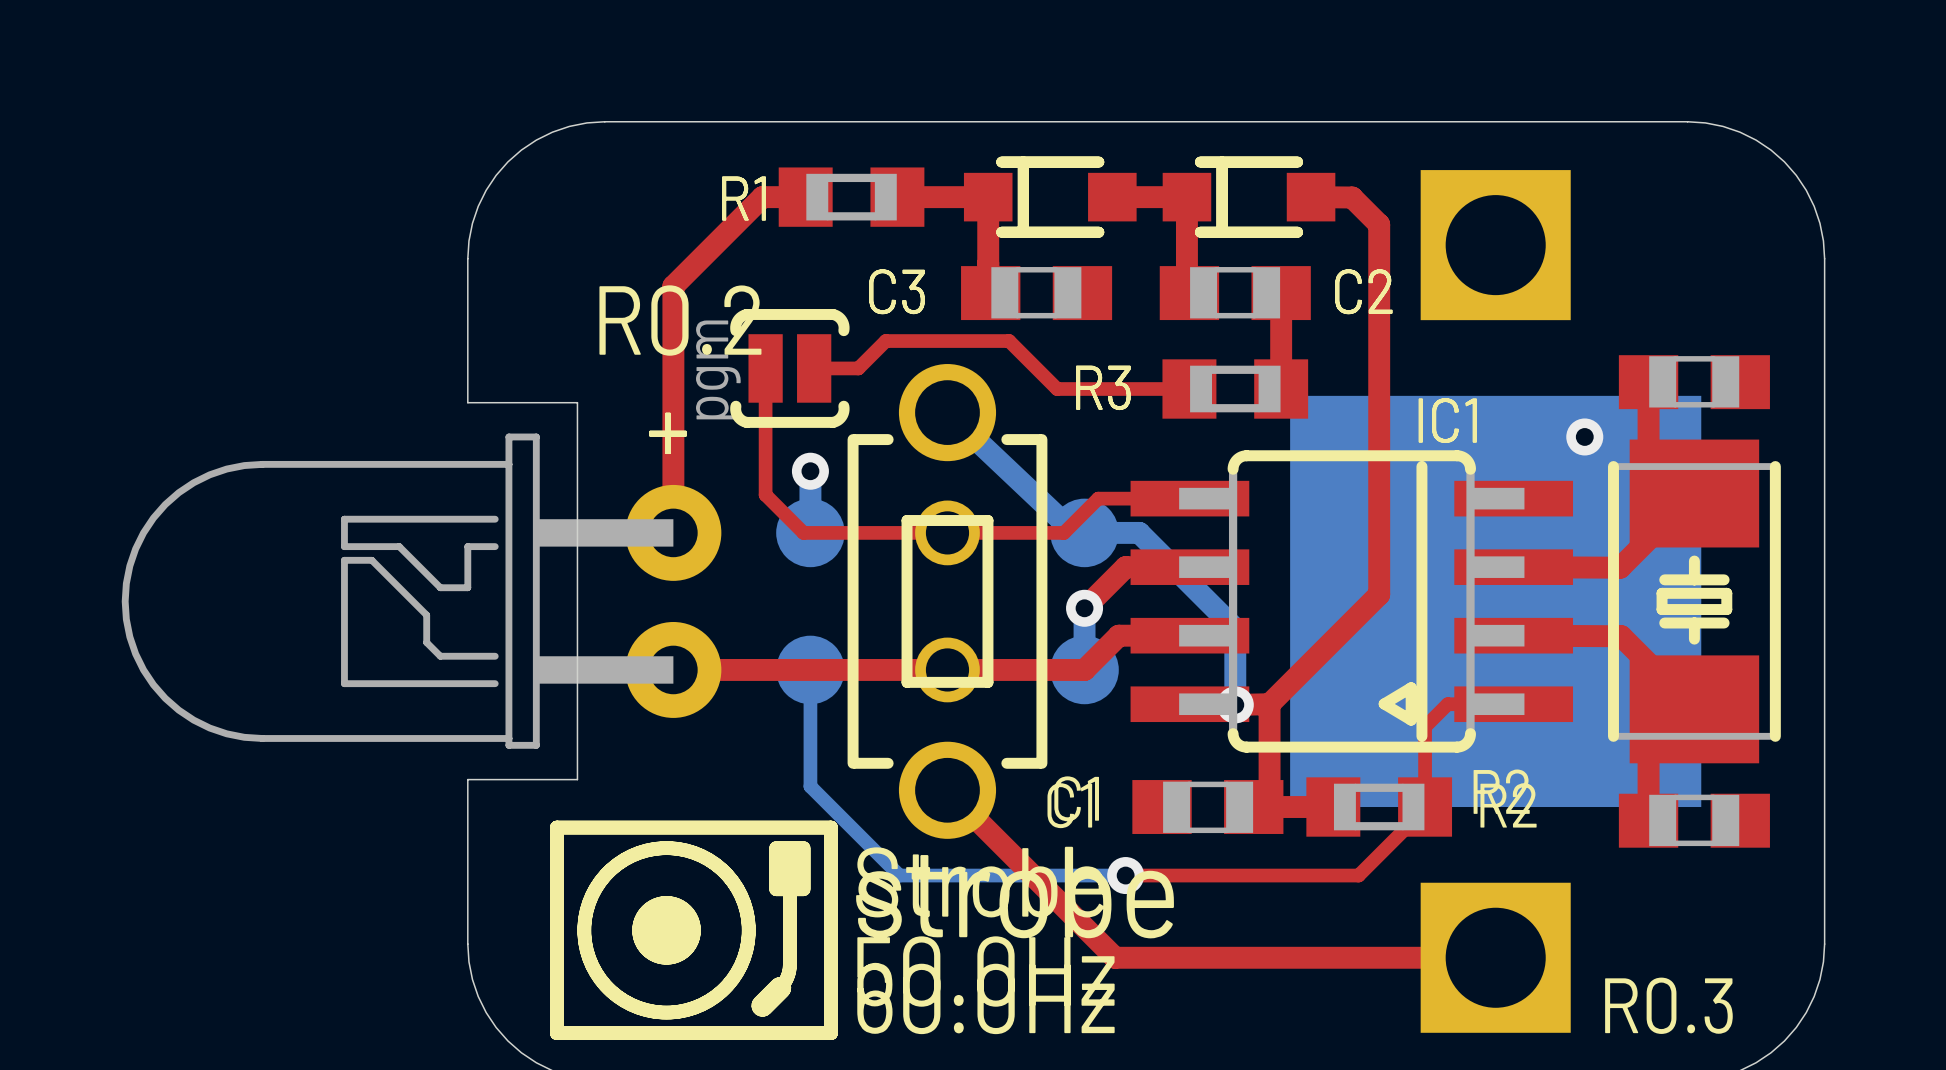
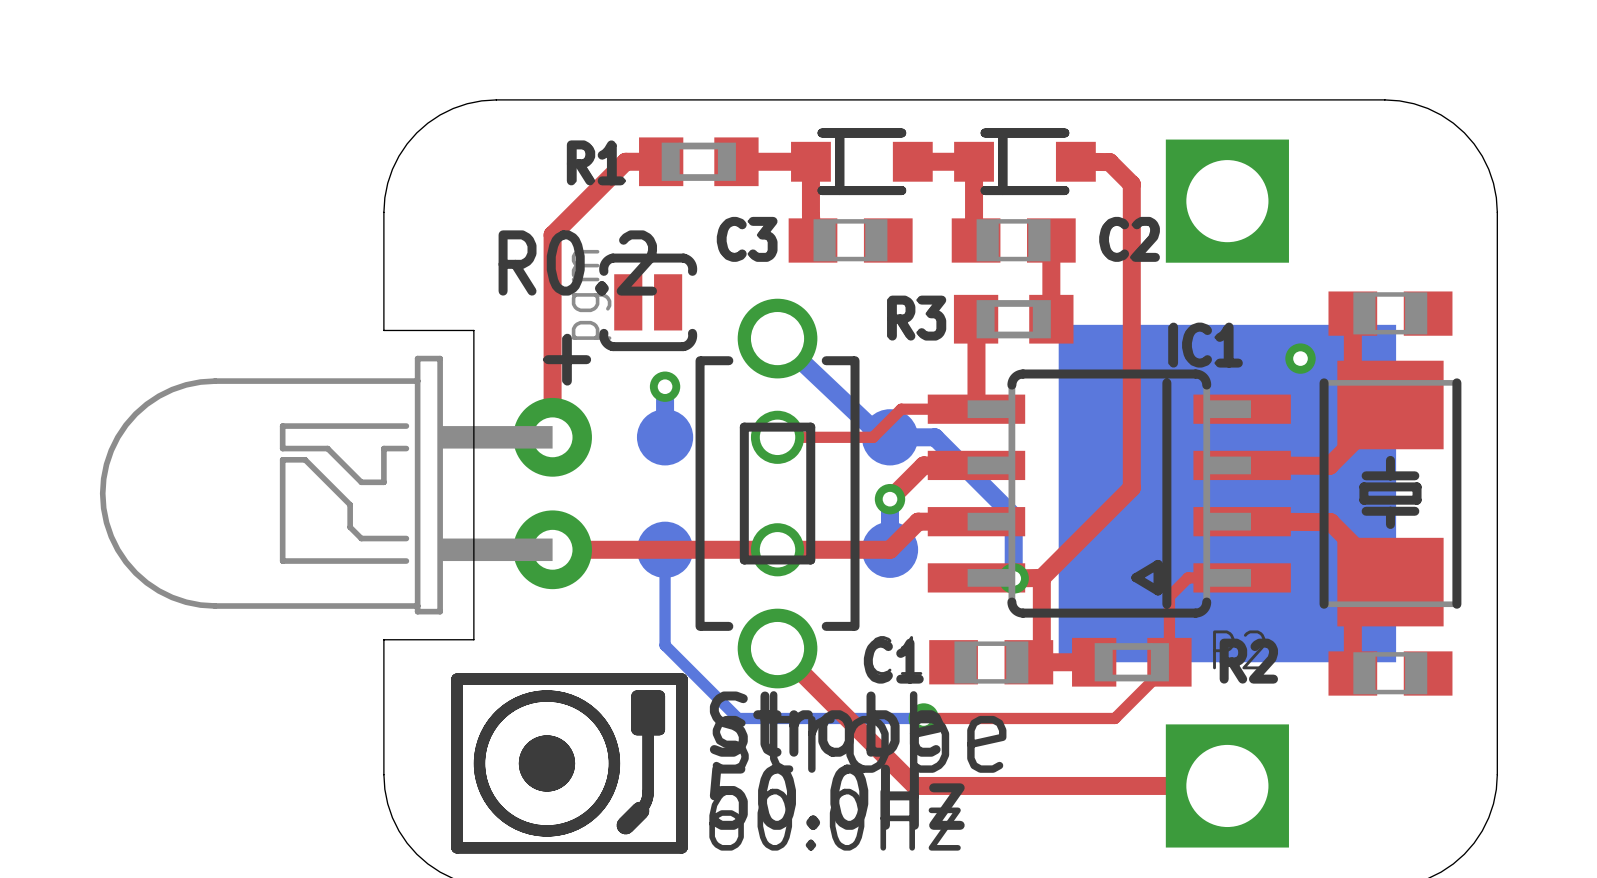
top track: (765, 368) (765, 494) (803, 532) (947, 532) -> none
top track: (814, 368) (858, 368) (885, 341) (1009, 341) (1057, 389) (1189, 389) -> (976, 409) (976, 319)
text: R0.3 (1668, 1005) -> none

